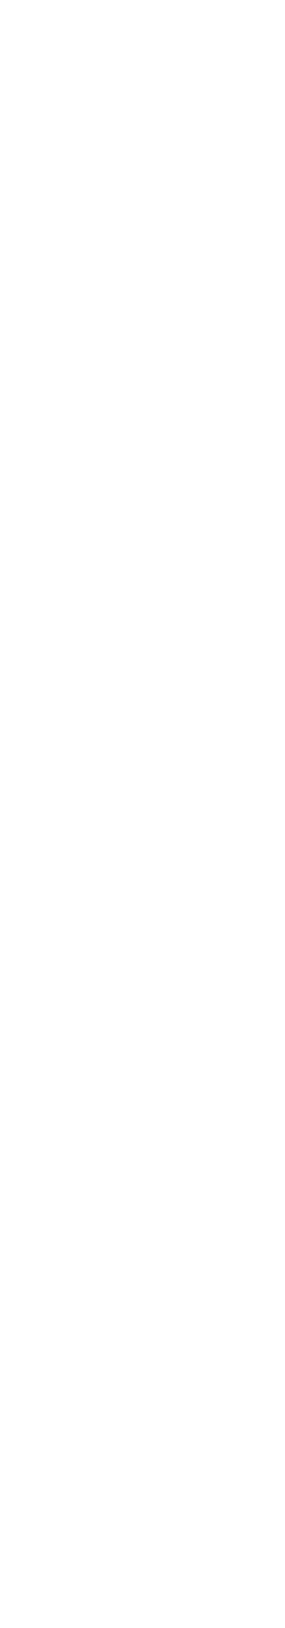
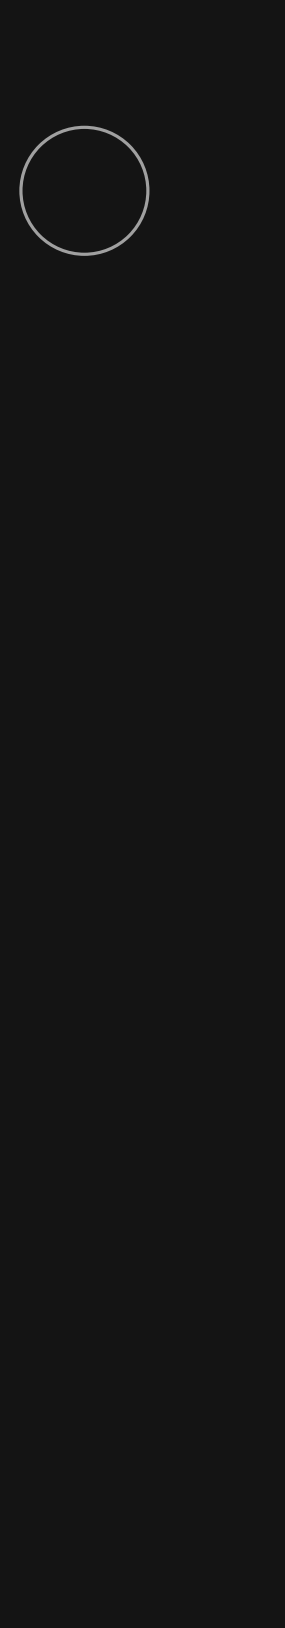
round board edge: none -> [19, 125, 150, 256]

